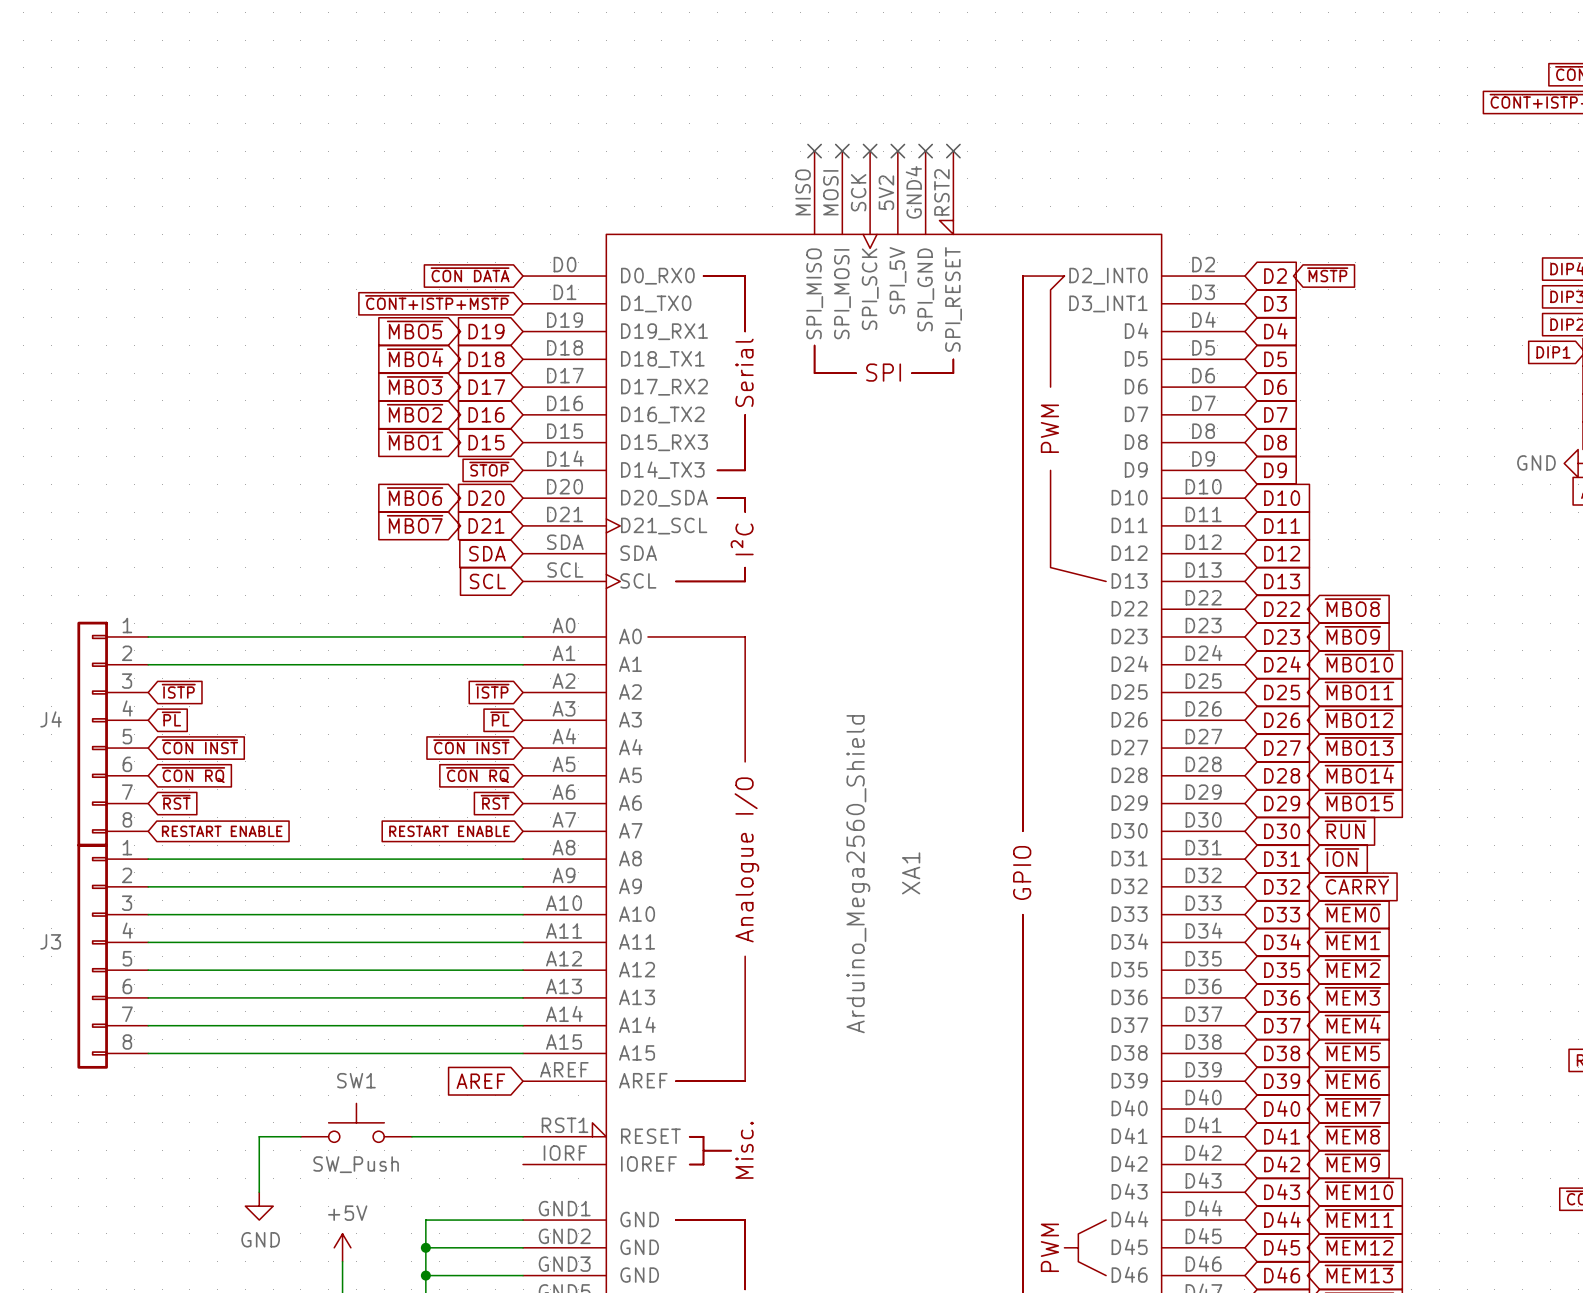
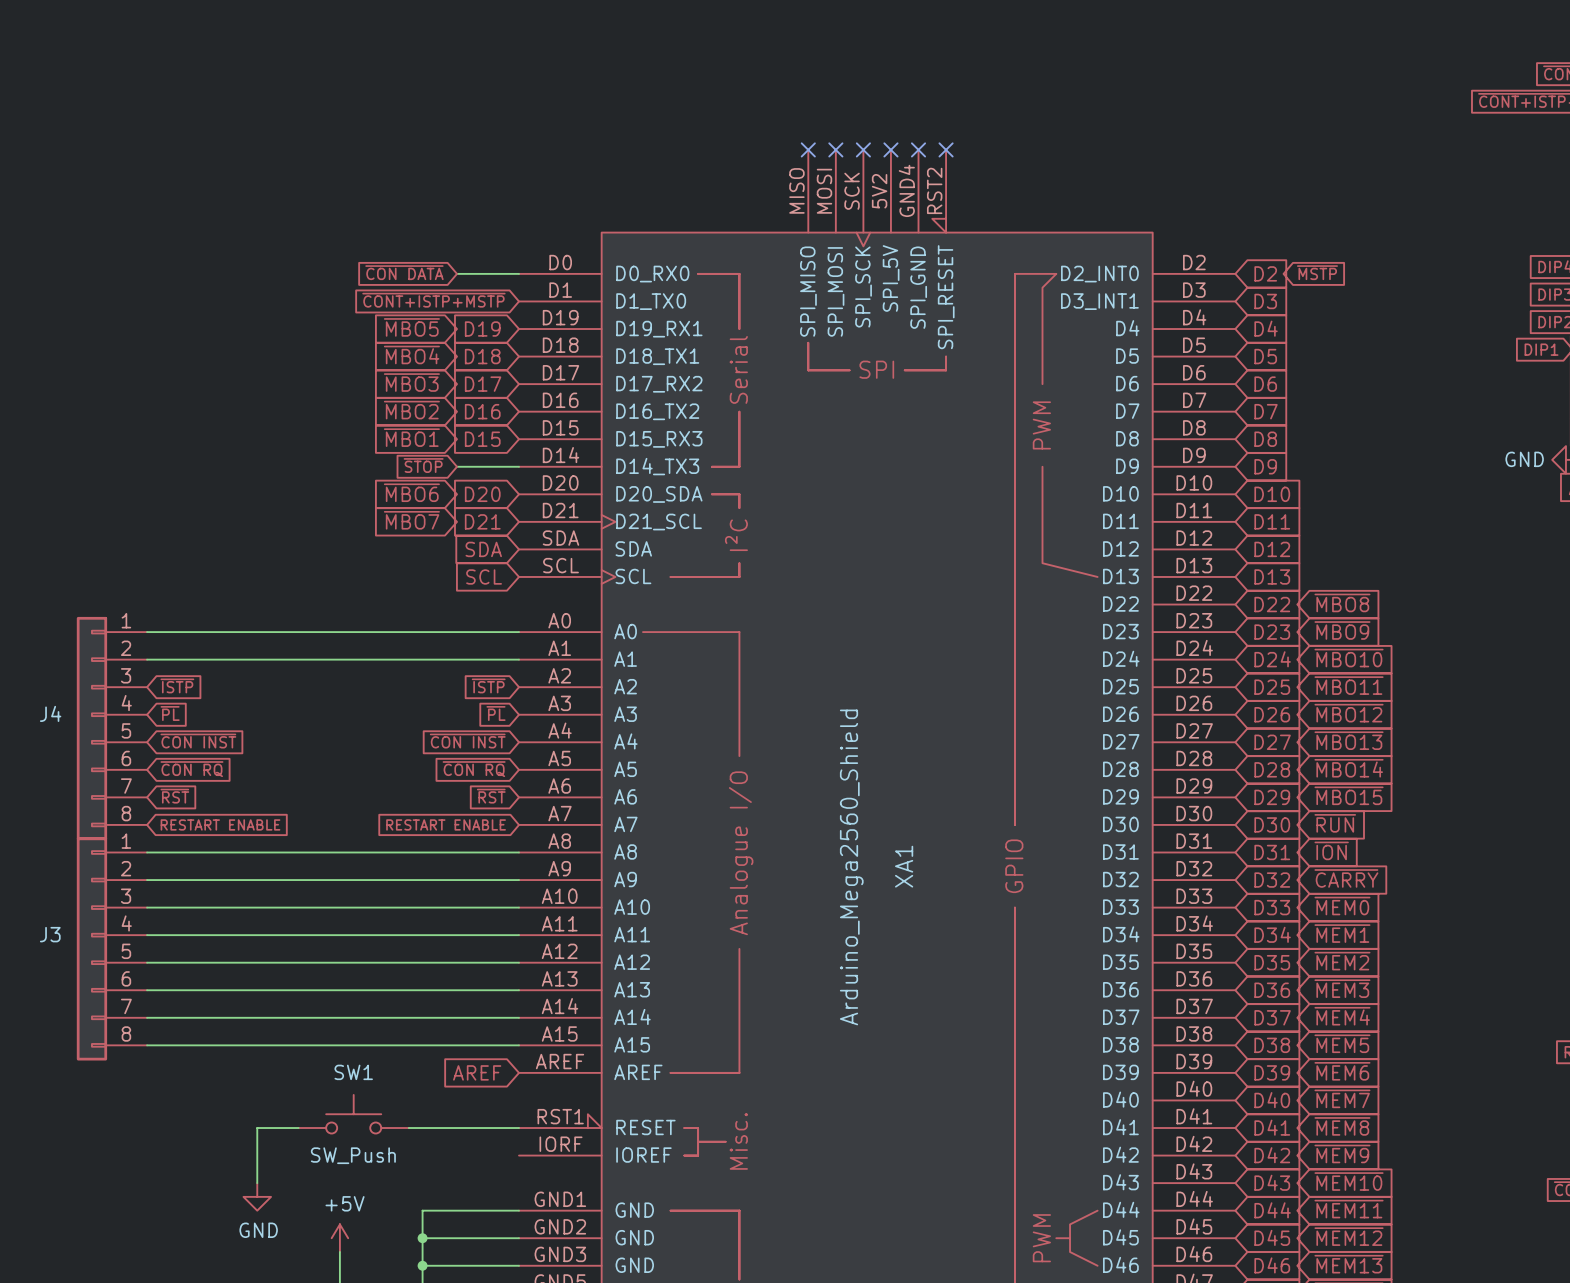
global label position: ~{CON DATA} (470, 274) -> ~{CON DATA} (404, 272)
wire: none -> (457, 273) (519, 273)
global label position: ~{STOP} (489, 469) -> ~{STOP} (423, 465)
wire: none -> (457, 466) (519, 466)

